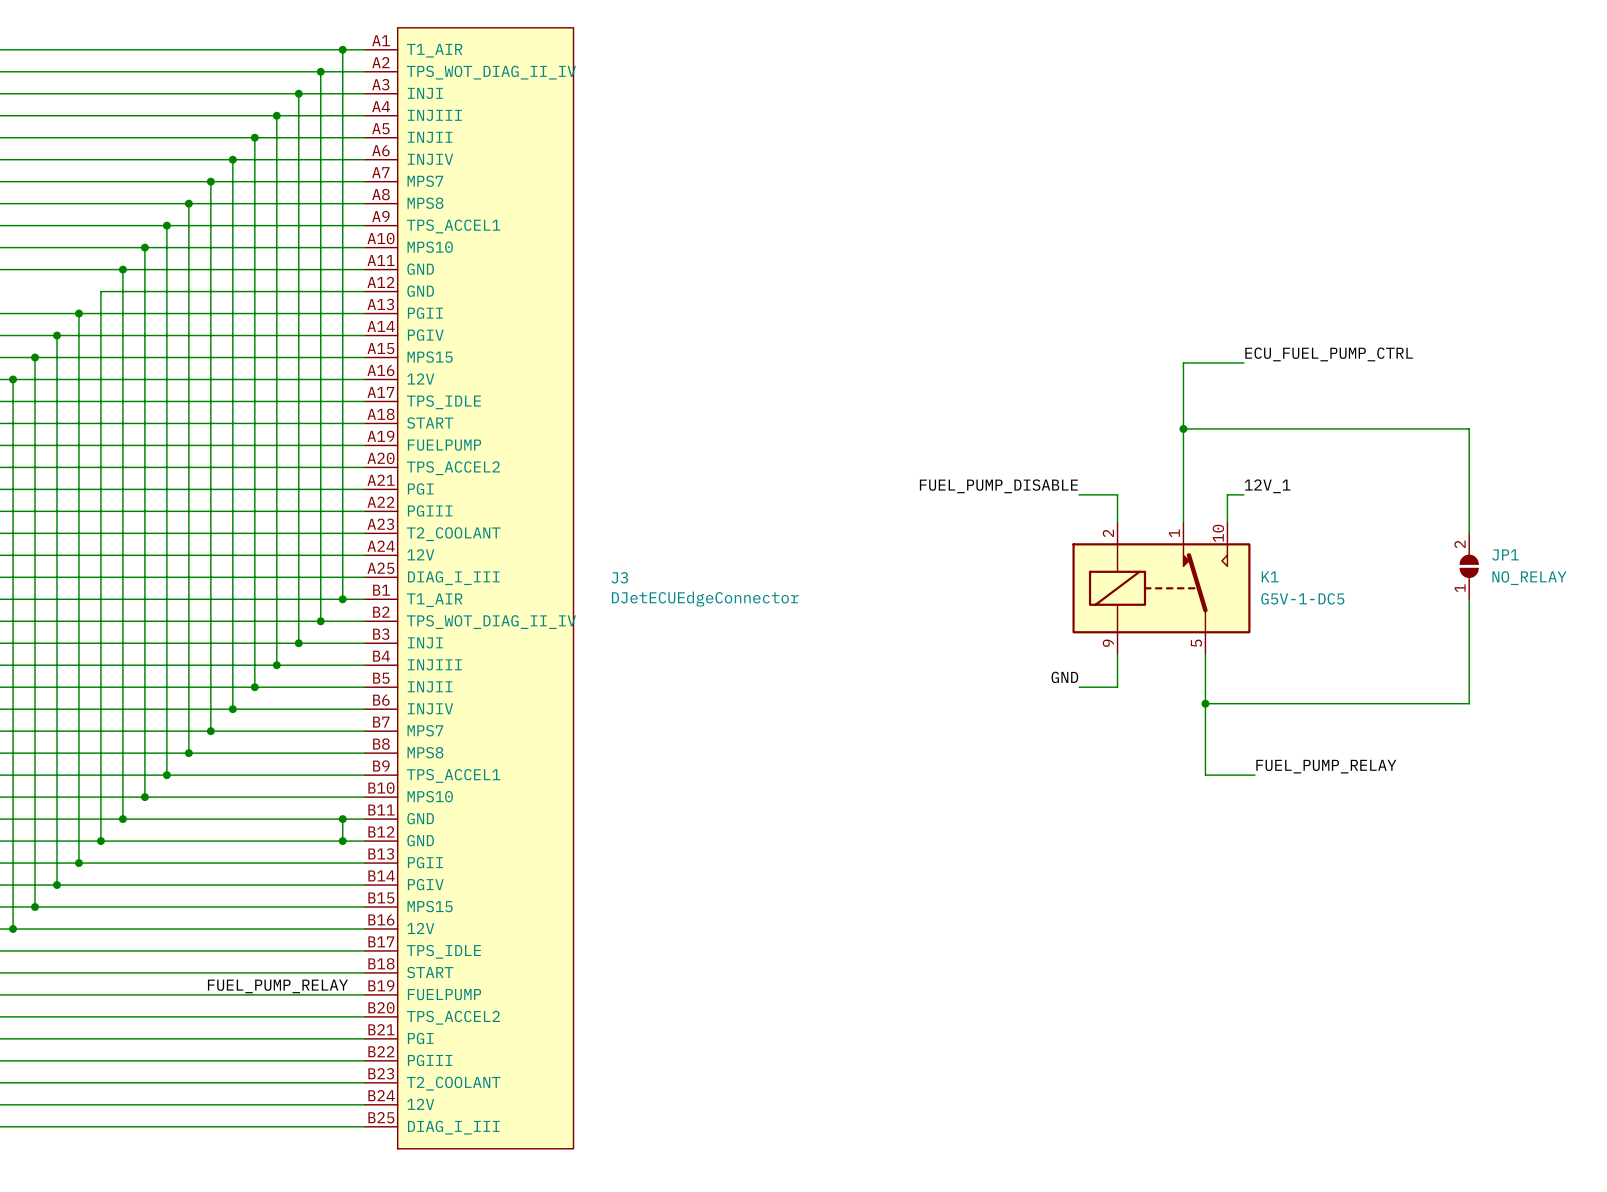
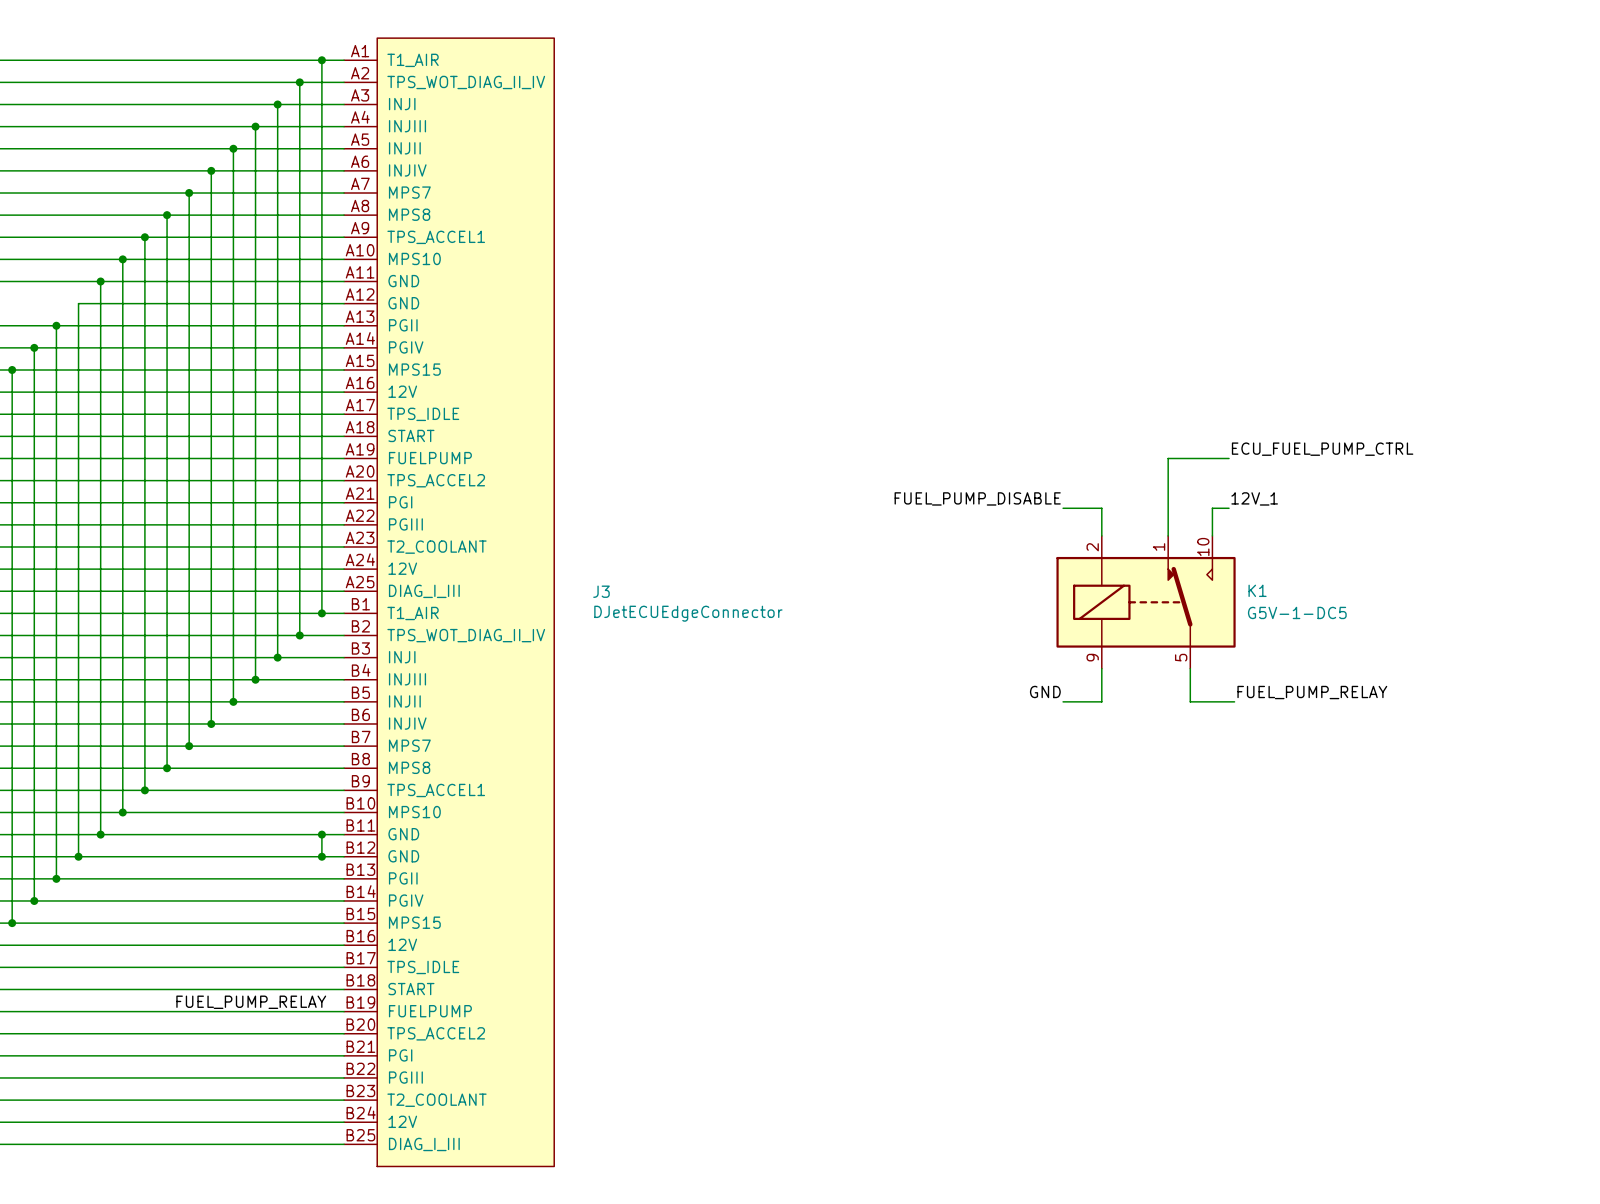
label position: ECU_FUEL_PUMP_CTRL (1329, 354) -> ECU_FUEL_PUMP_CTRL (1322, 449)
wire: (1243, 363) (1183, 363) (1183, 445) -> (1229, 458) (1168, 458)
wire: (1183, 428) (1469, 428) (1469, 533) -> none
junction: (1183, 428) -> none
JP1: NO_RELAY (1469, 566) -> none
wire: (1469, 599) (1469, 703) (1205, 703) -> none
wire: (1205, 687) (1205, 775) (1254, 775) -> (1190, 701) (1234, 701)
junction: (1205, 703) -> none
label position: FUEL_PUMP_RELAY (1326, 766) -> FUEL_PUMP_RELAY (1312, 692)

